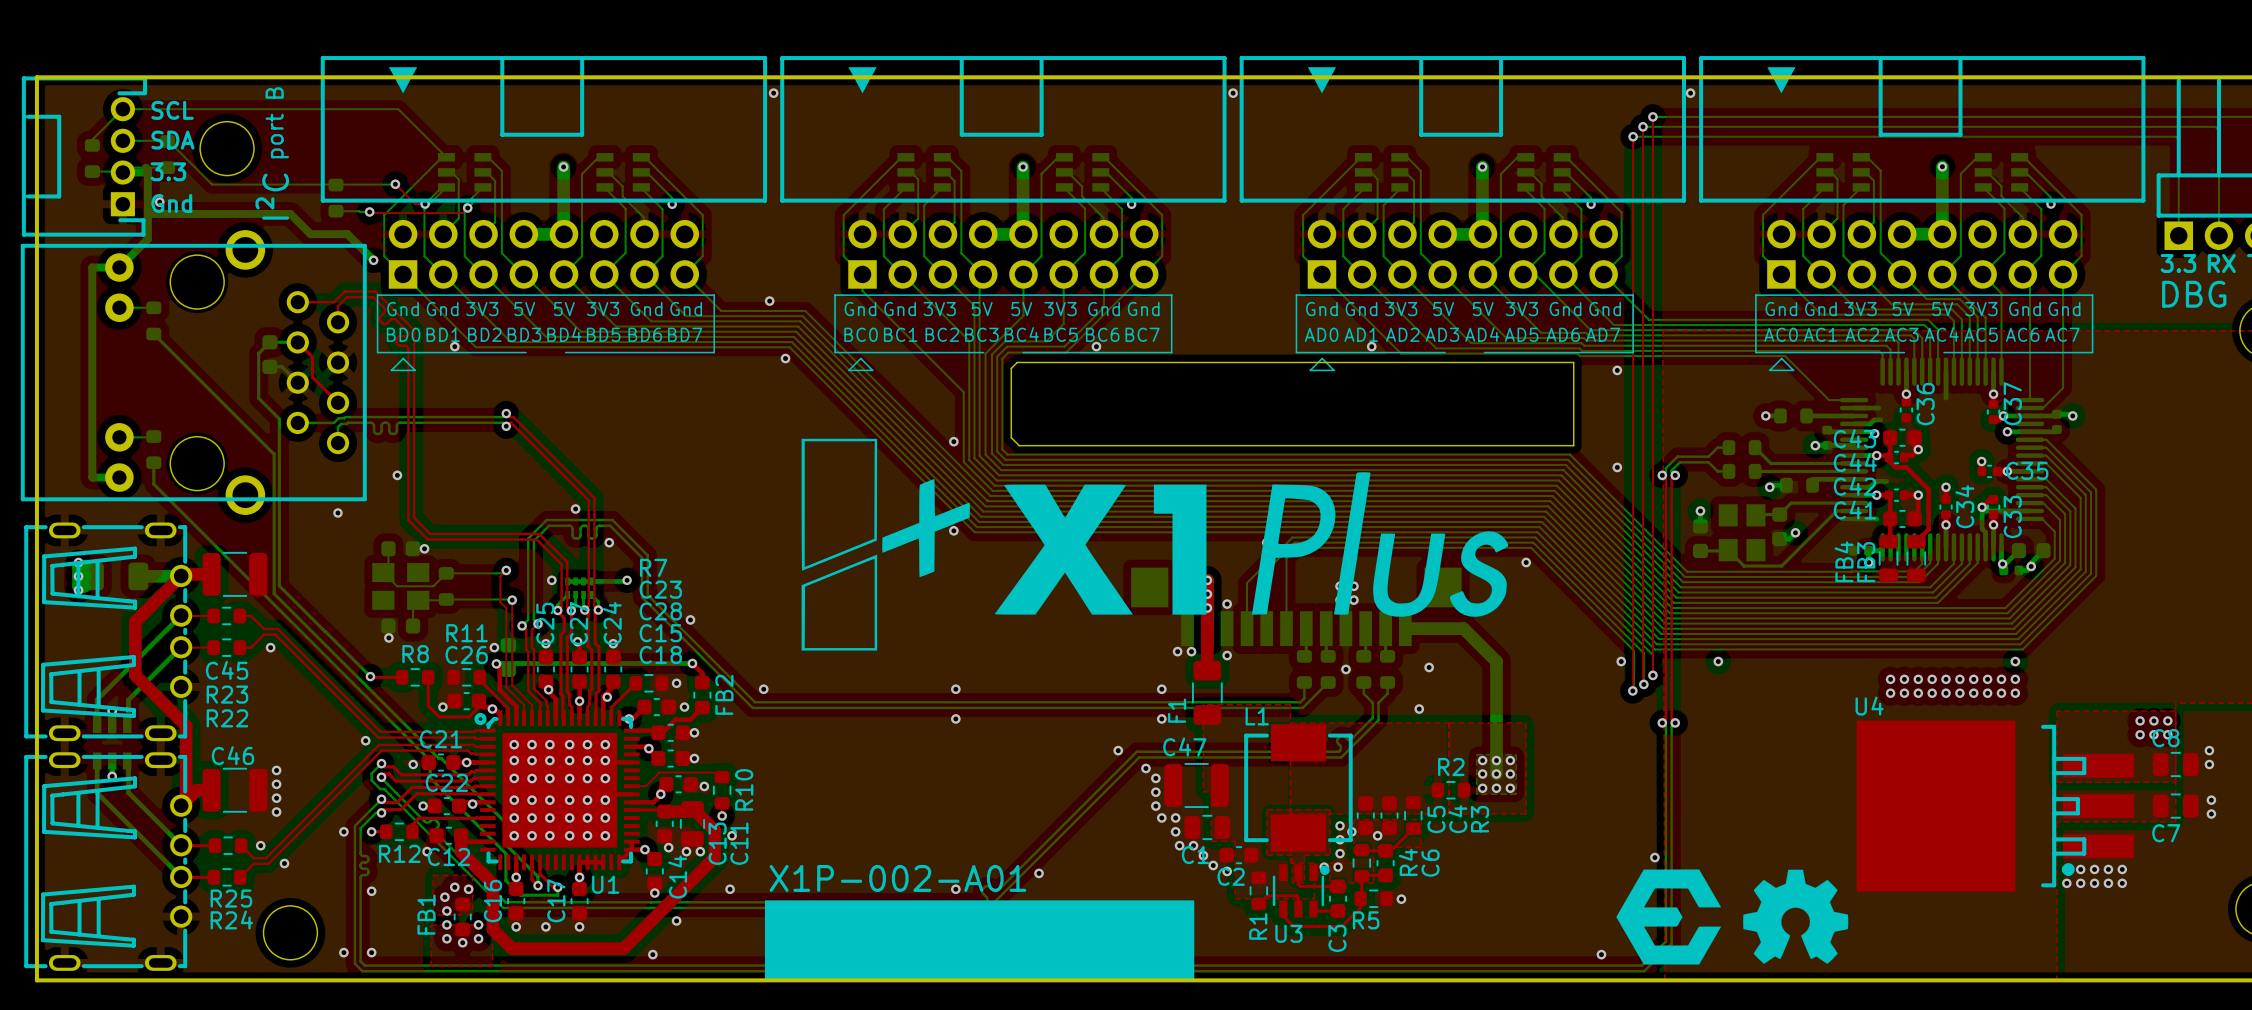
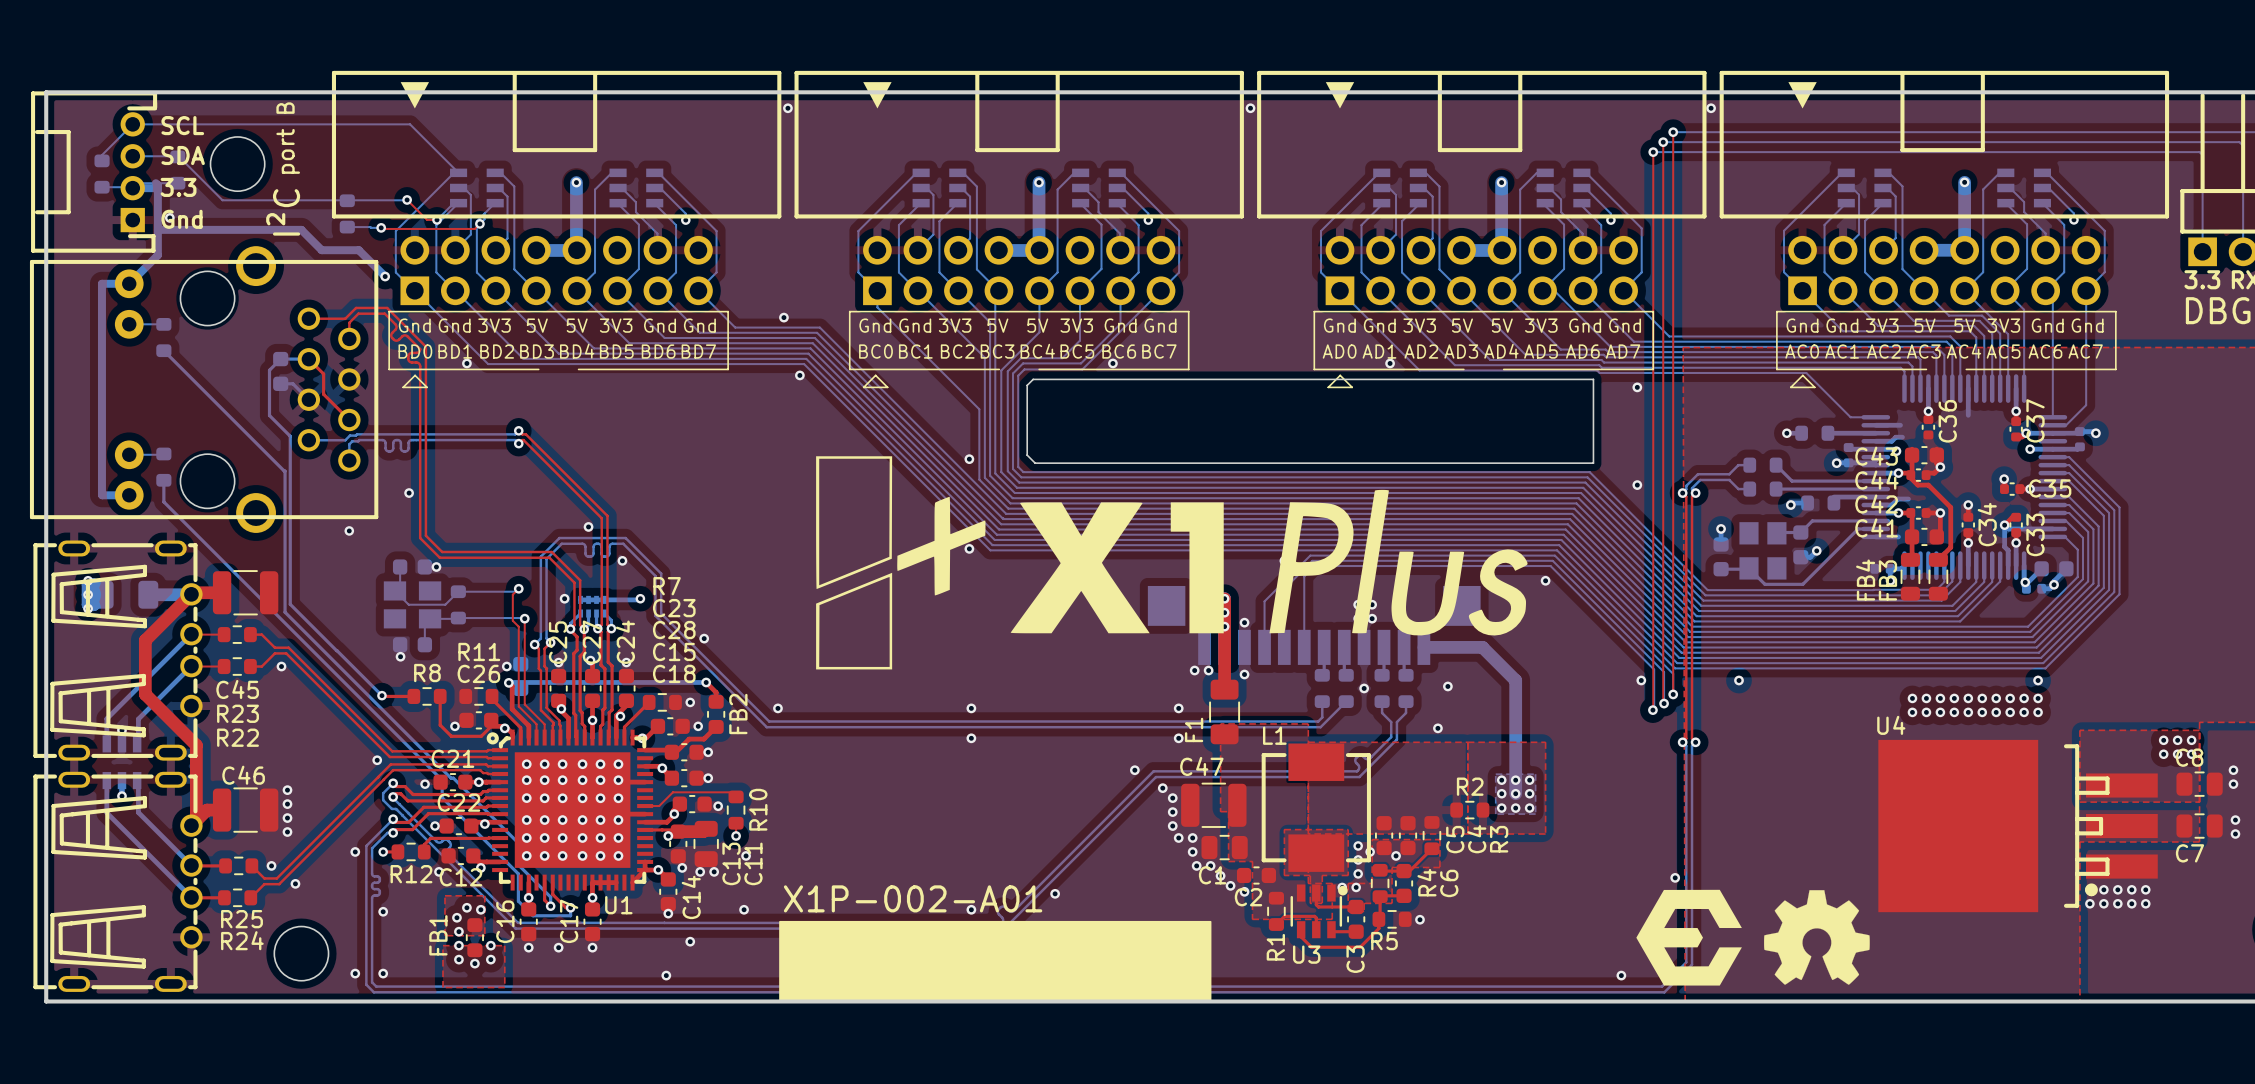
top track: (692, 808) (714, 830) (714, 857) (623, 948) (512, 948) (492, 929) (492, 883) (461, 852) (461, 840) -> none
via: none -> (668, 836)
via: none -> (480, 867)

